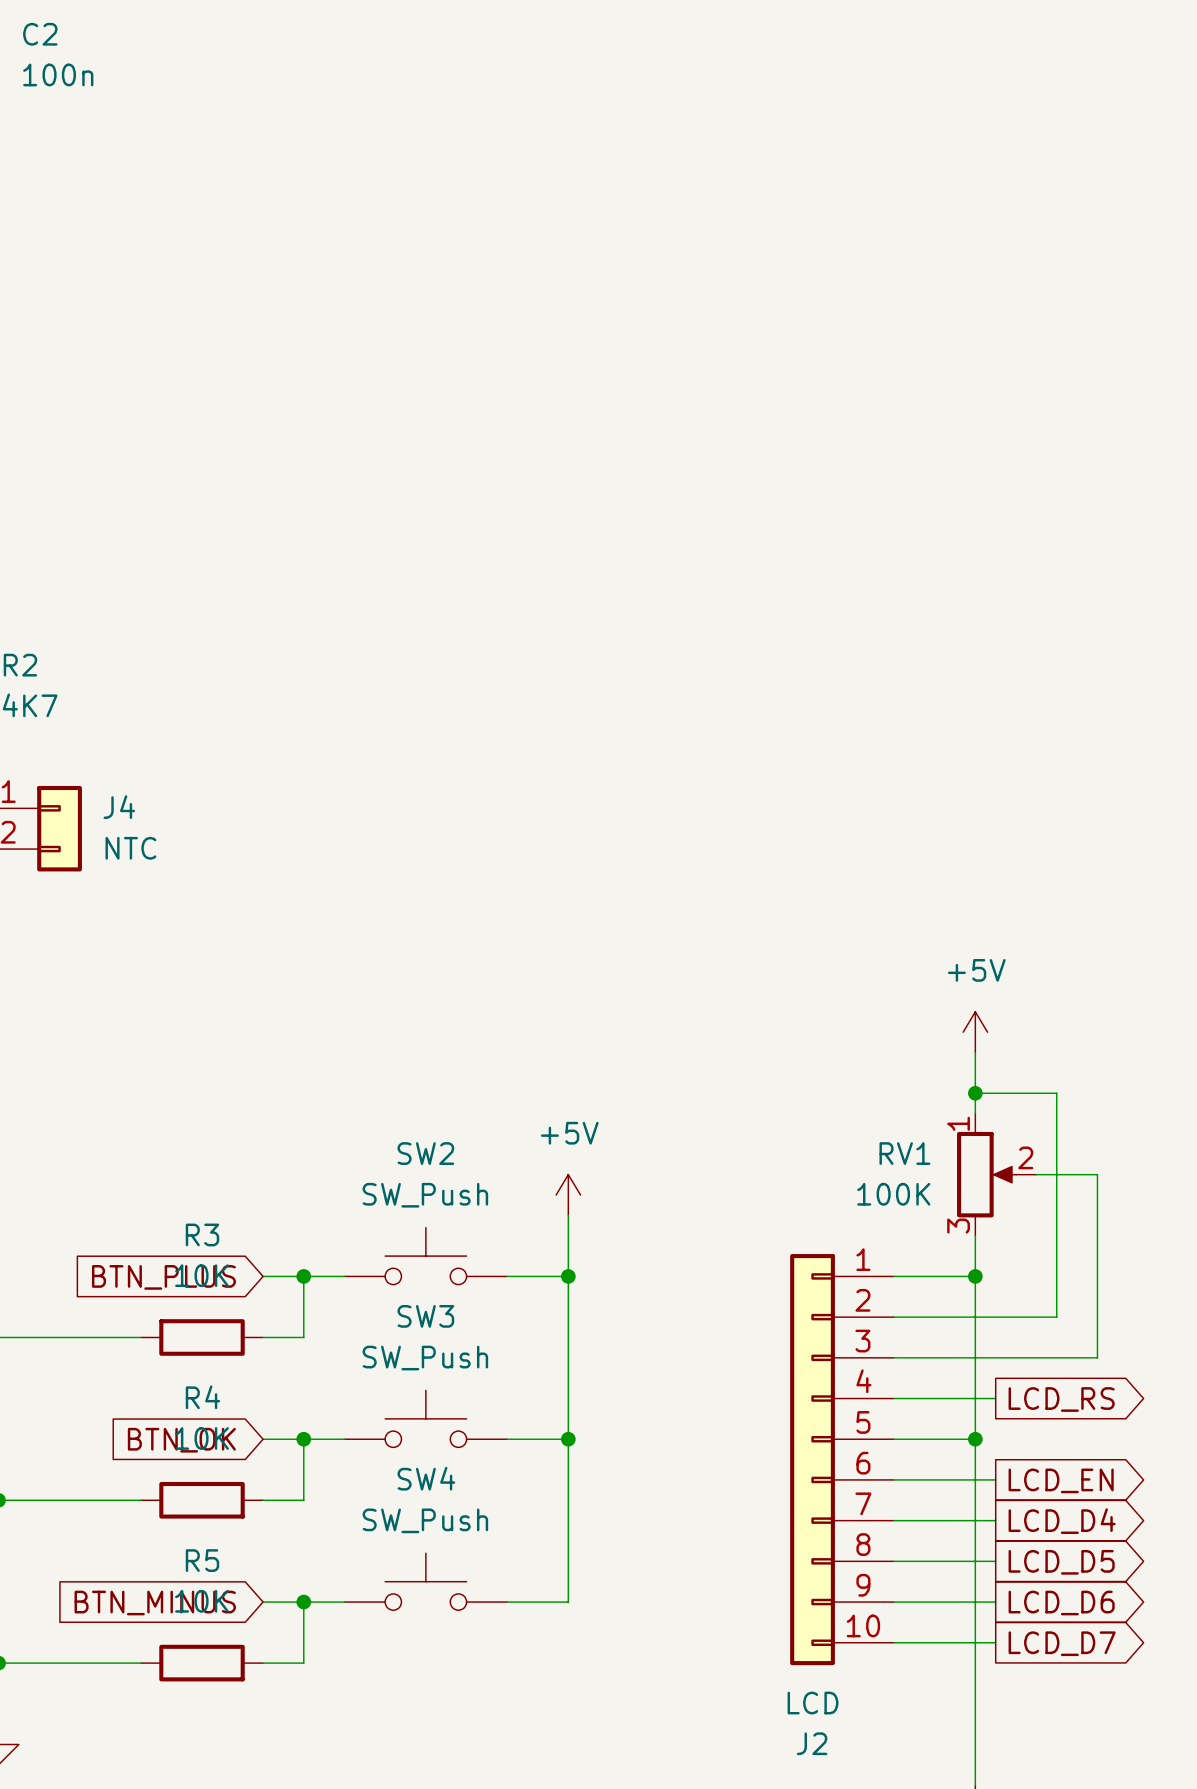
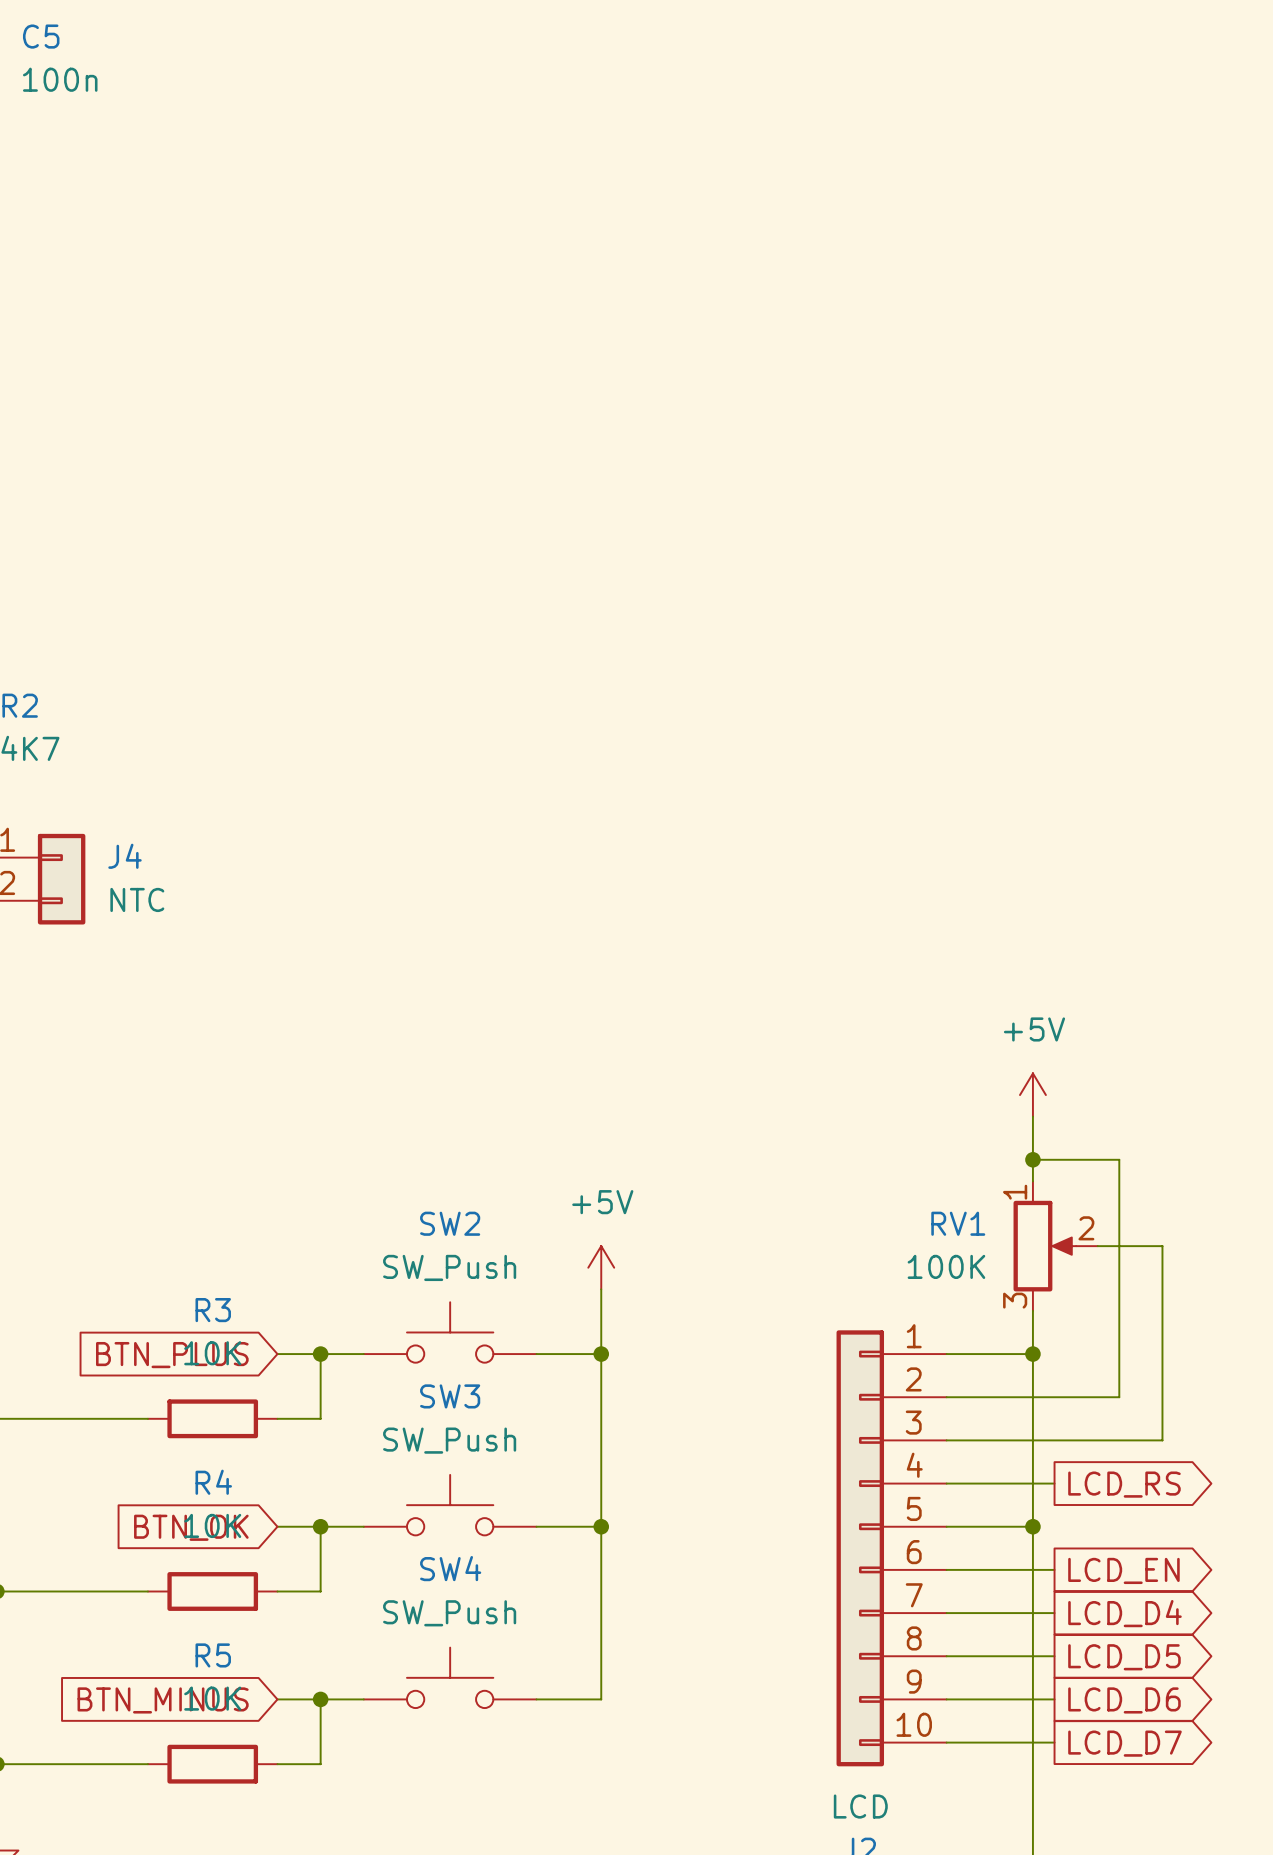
C2 name: C2 (40, 34) -> C5 (41, 36)

